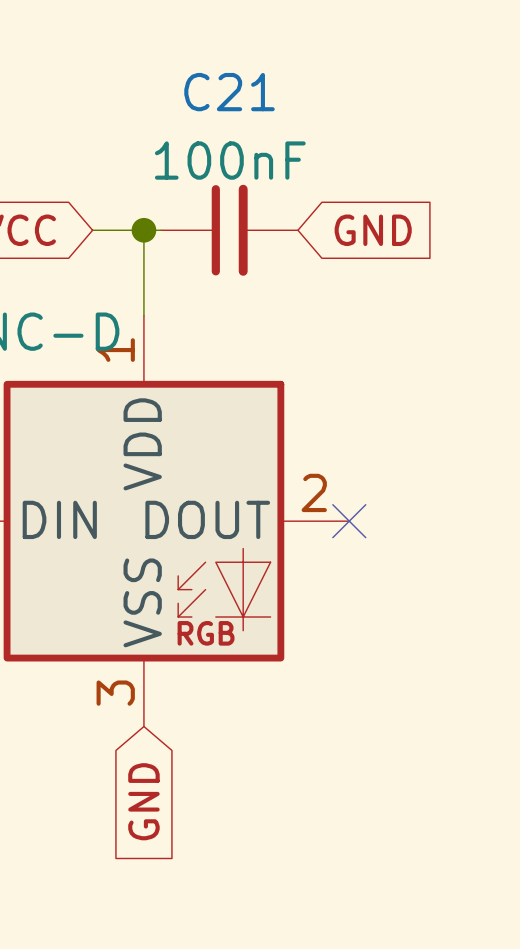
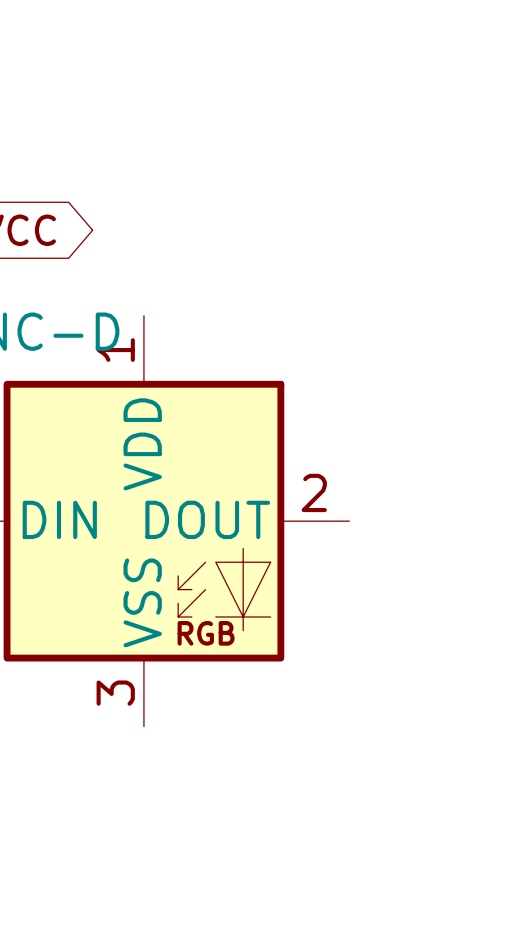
wire: (92, 230) (161, 230) -> none
wire: (143, 230) (143, 315) -> none
junction: (143, 230) -> none
C21: 100nF (229, 230) -> none
global label: GND (373, 230) -> none
no-connect mark: (349, 521) -> none
global label: GND (143, 801) -> none

